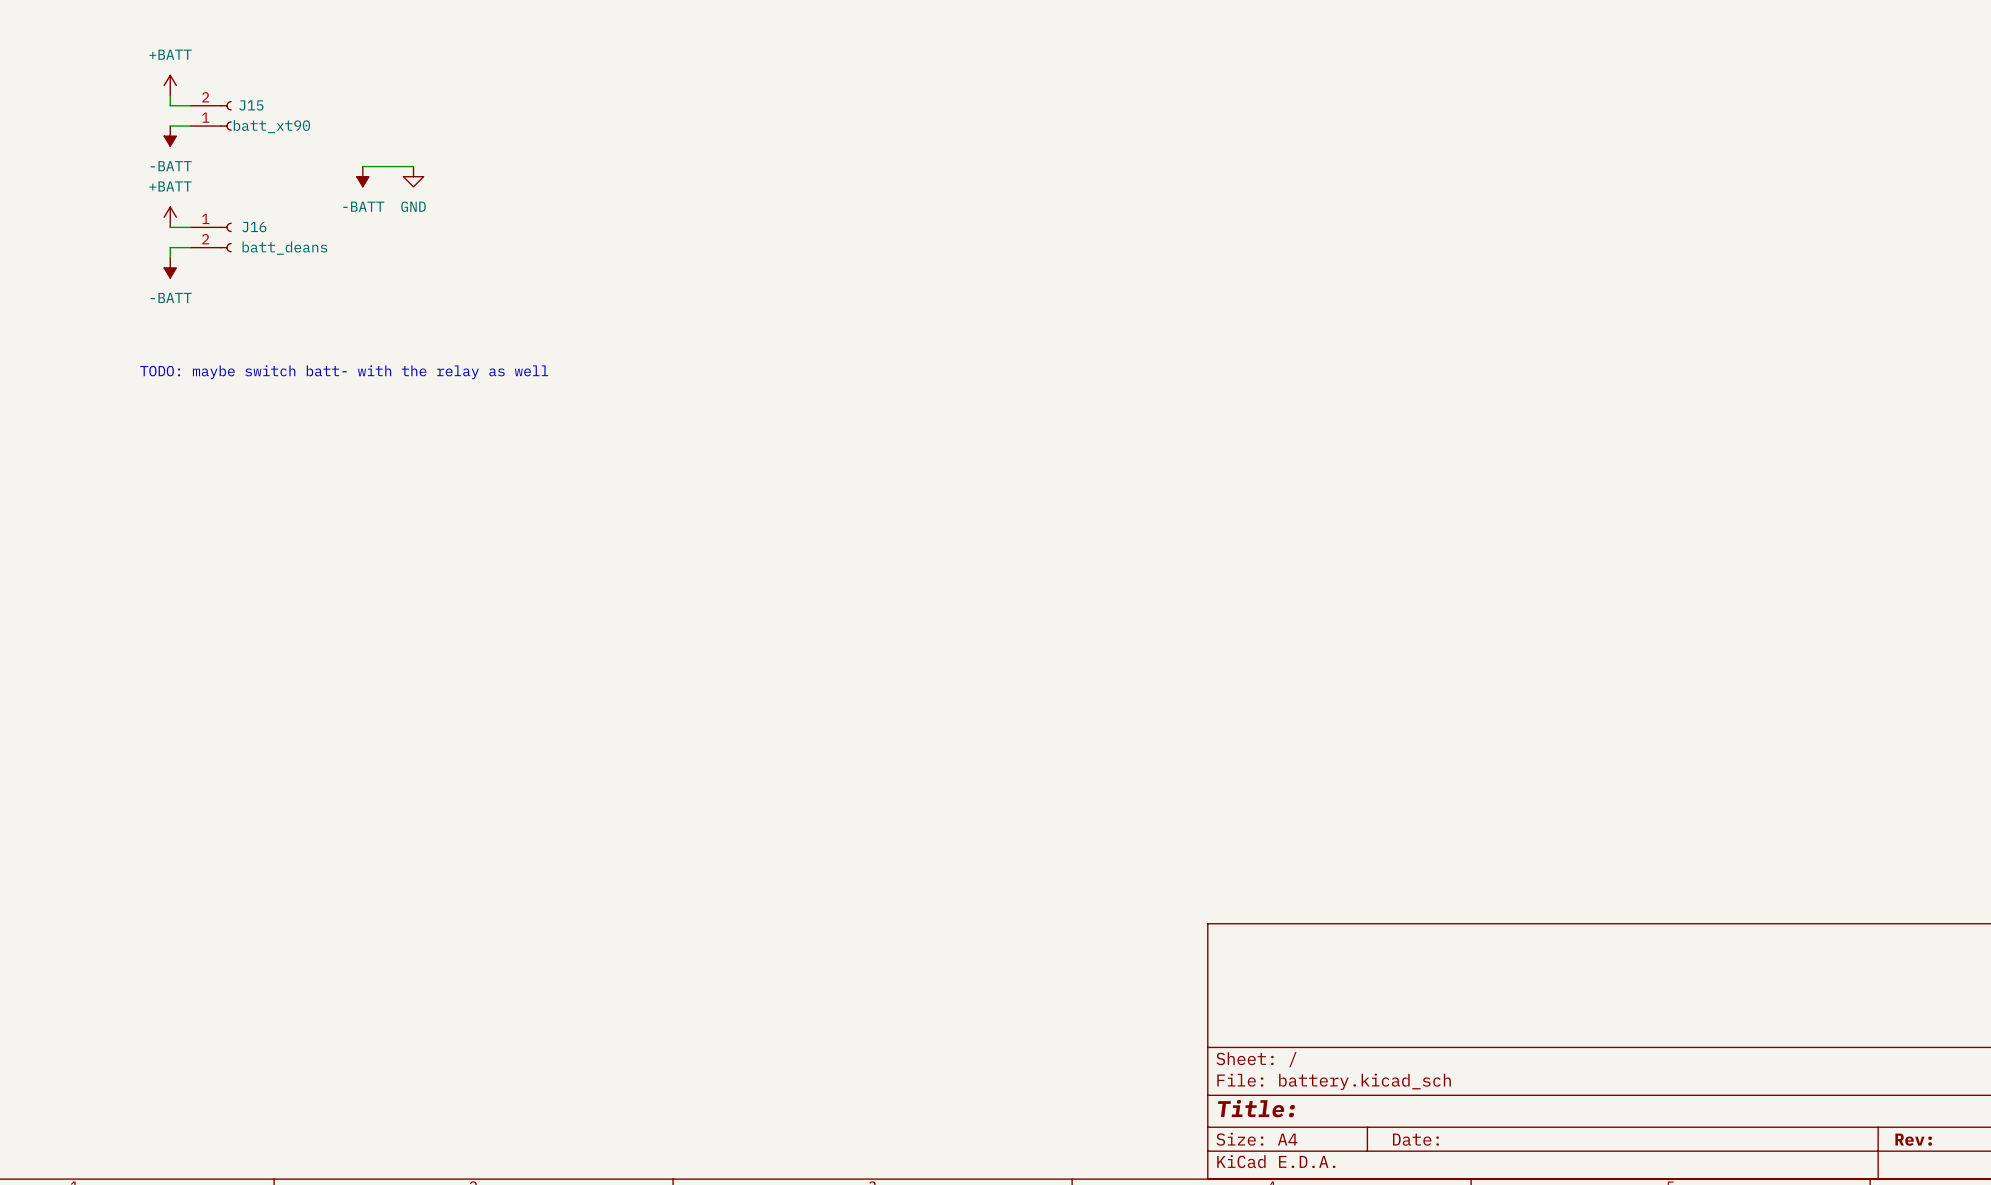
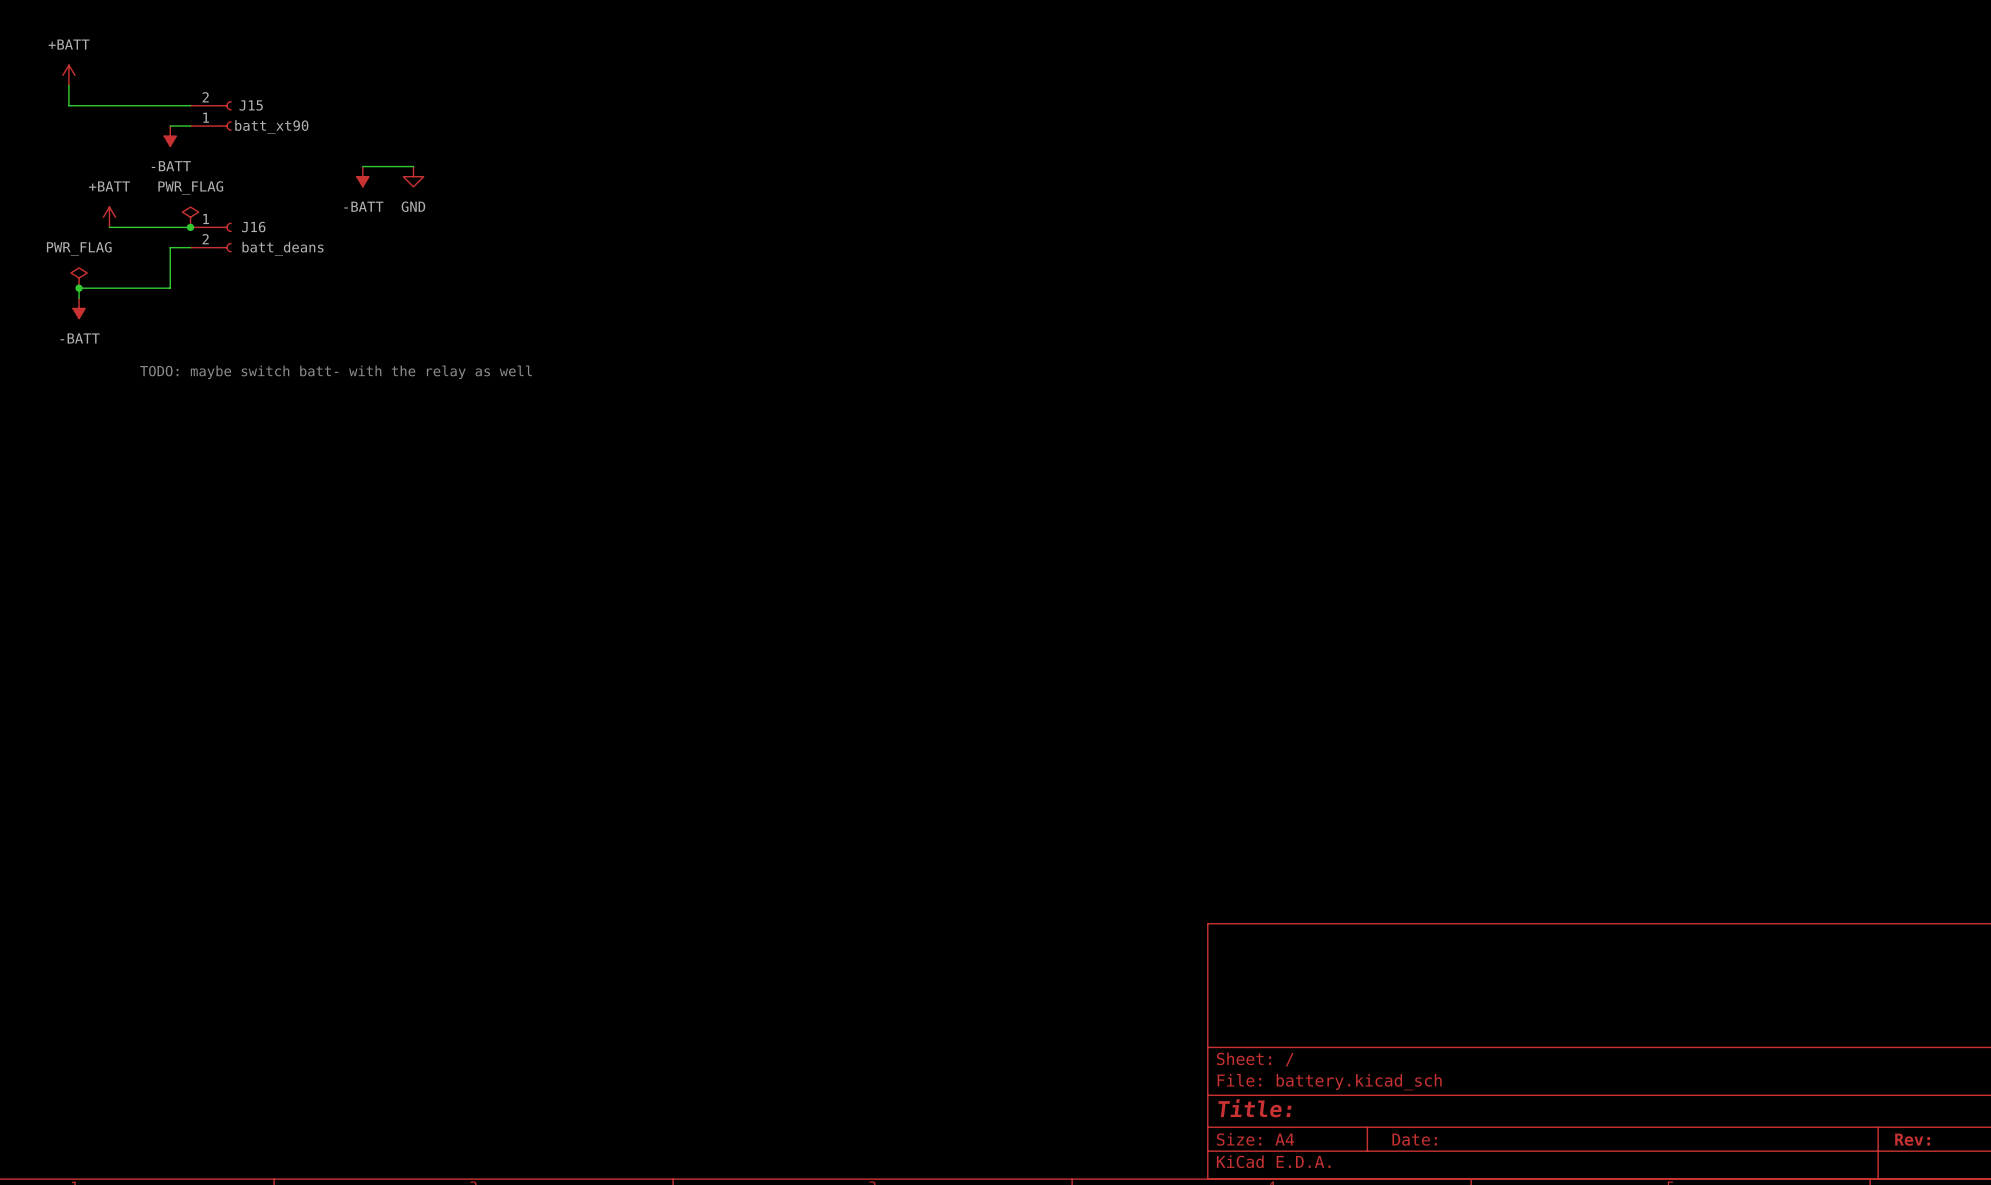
power symbol: none -> +BATT (68, 75)
power symbol: +BATT (170, 85) -> none
wire: (170, 95) (170, 105) -> (68, 85) (68, 105) (170, 105)
power symbol position: +BATT (170, 217) -> +BATT (109, 217)
power symbol: none -> PWR_FLAG (190, 217)
wire: none -> (109, 227) (170, 227)
junction: none -> (190, 227)
wire: none -> (170, 257) (170, 288) (79, 288) (79, 298)
power symbol position: -BATT (170, 267) -> -BATT (79, 308)
power symbol: none -> PWR_FLAG (79, 278)
junction: none -> (79, 288)

